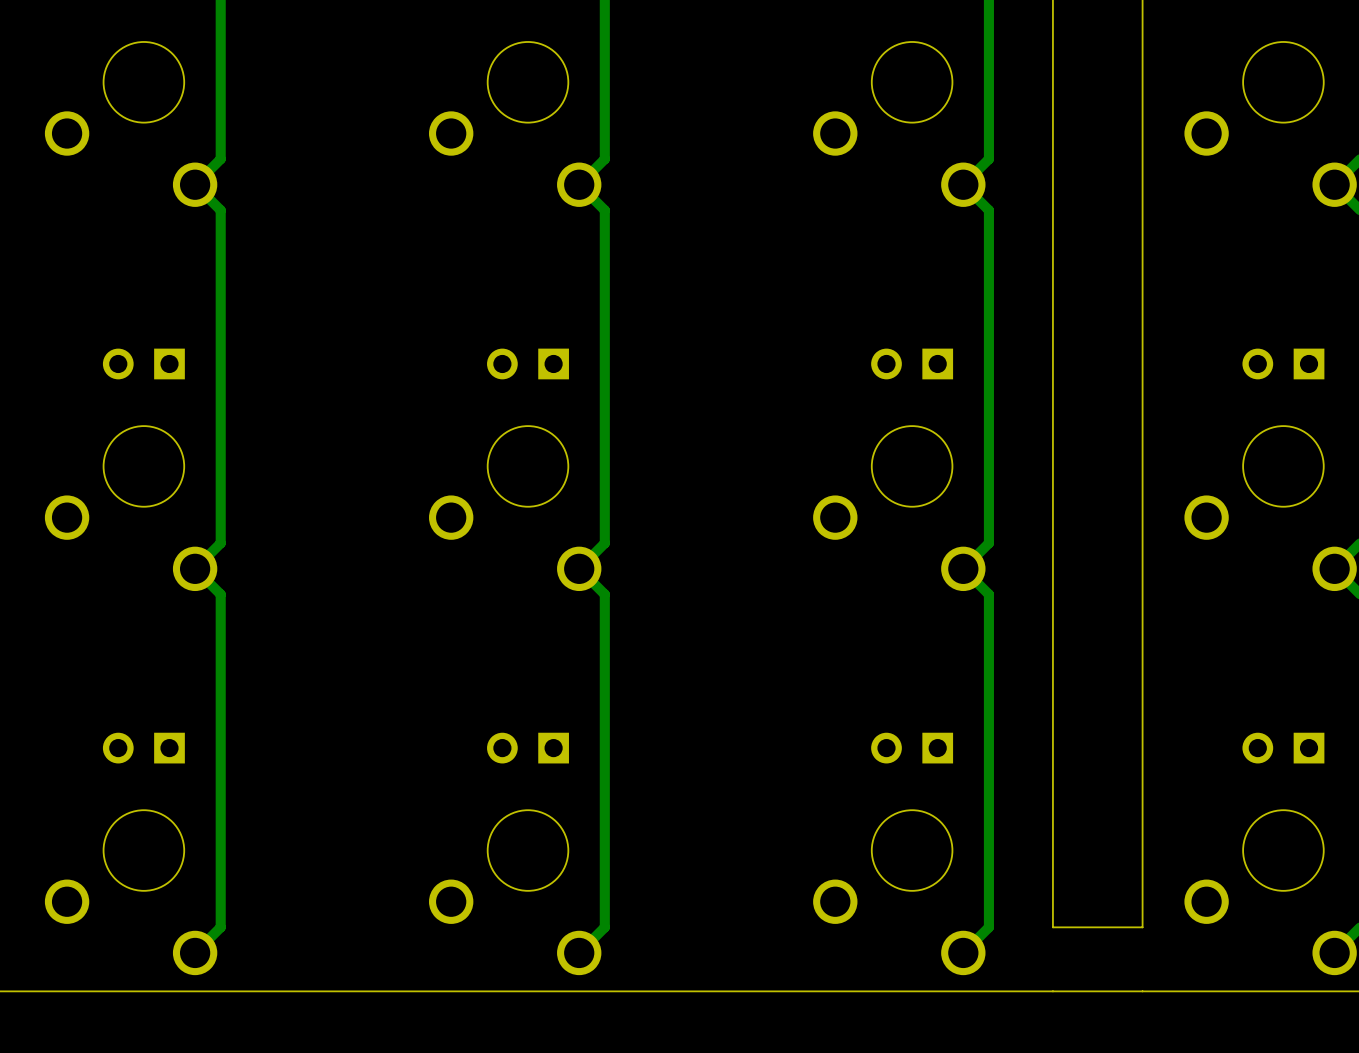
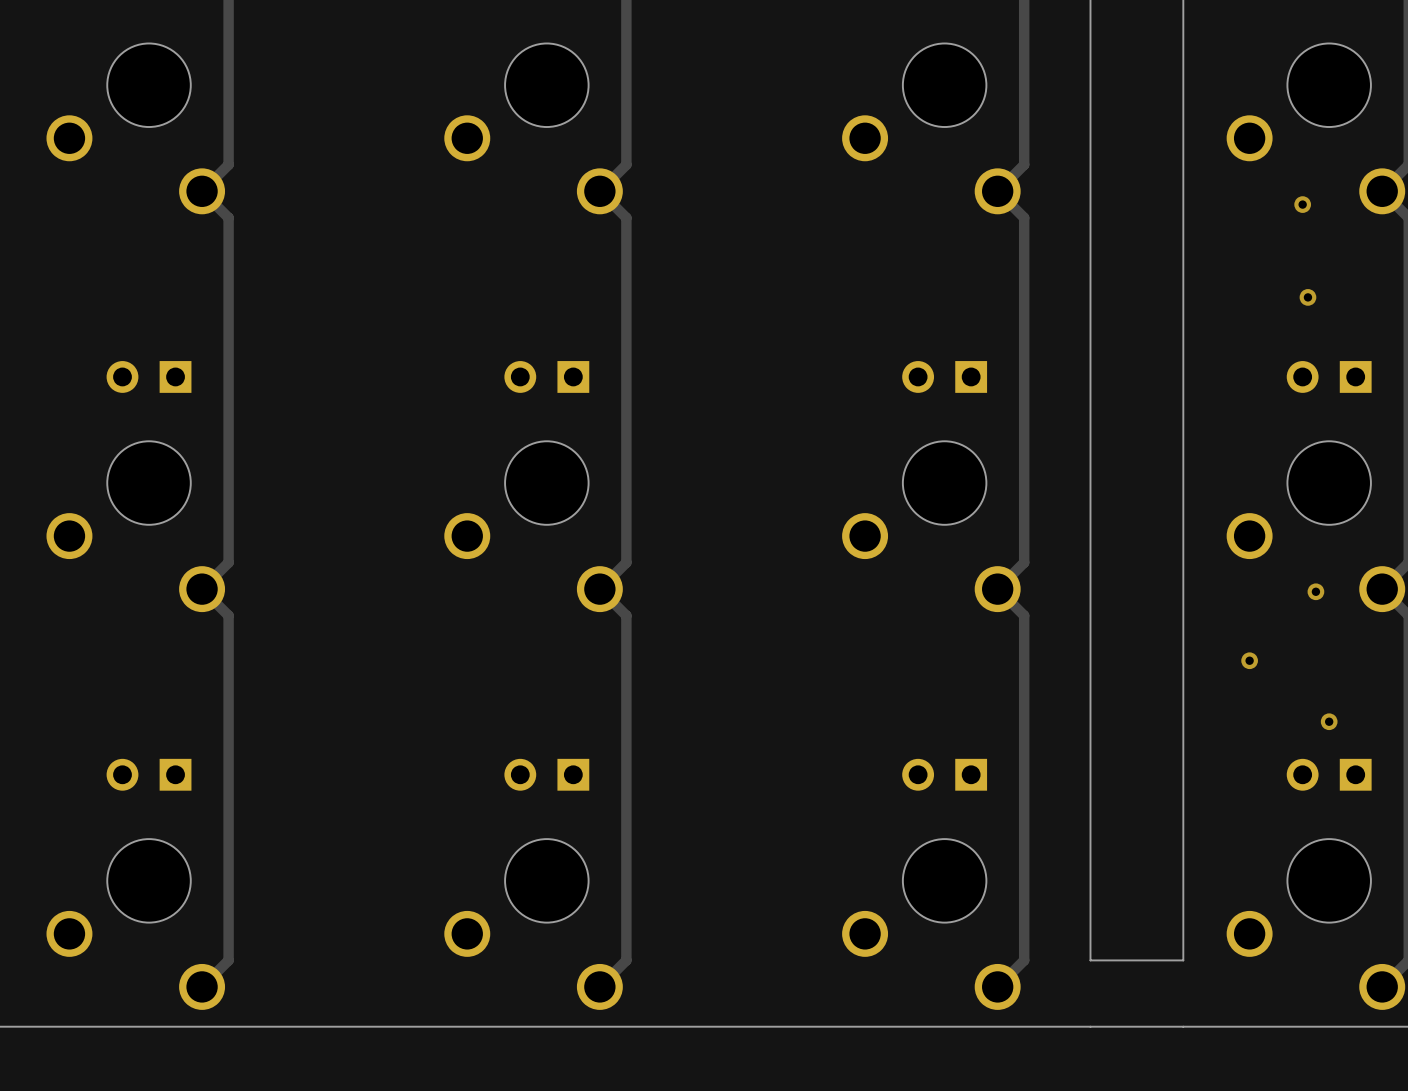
via: none -> (1302, 204)
via: none -> (1307, 297)
via: none -> (1315, 591)
via: none -> (1249, 660)
via: none -> (1329, 721)

